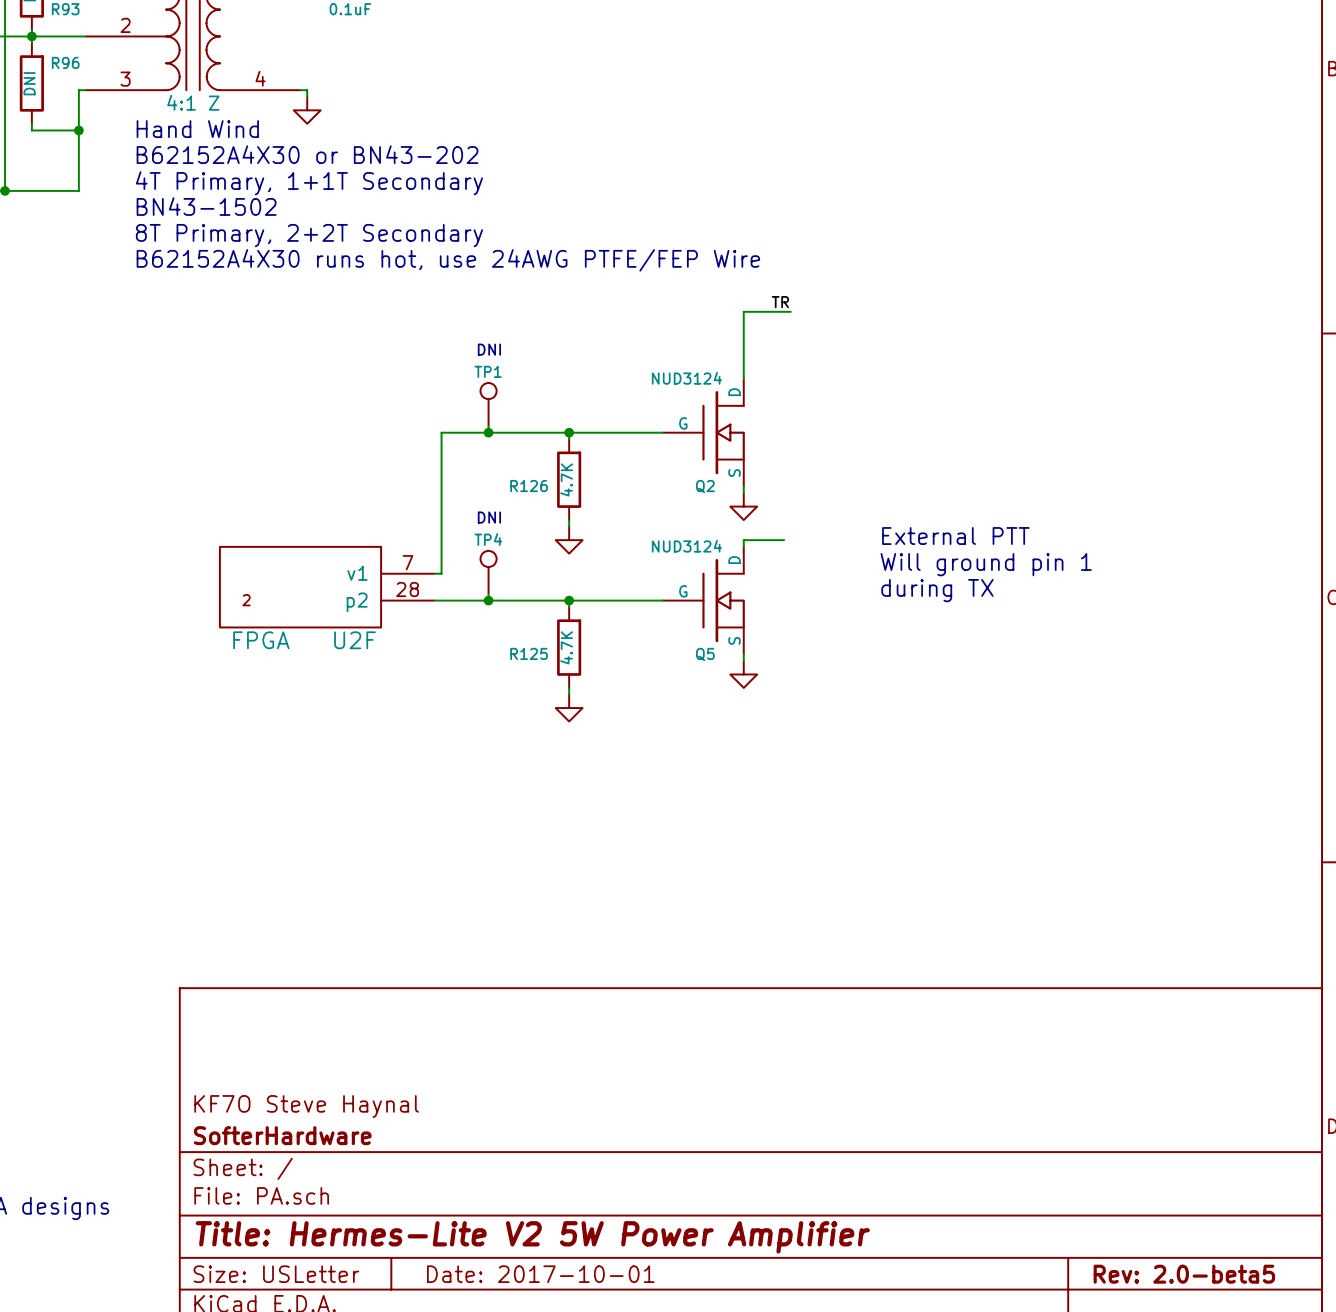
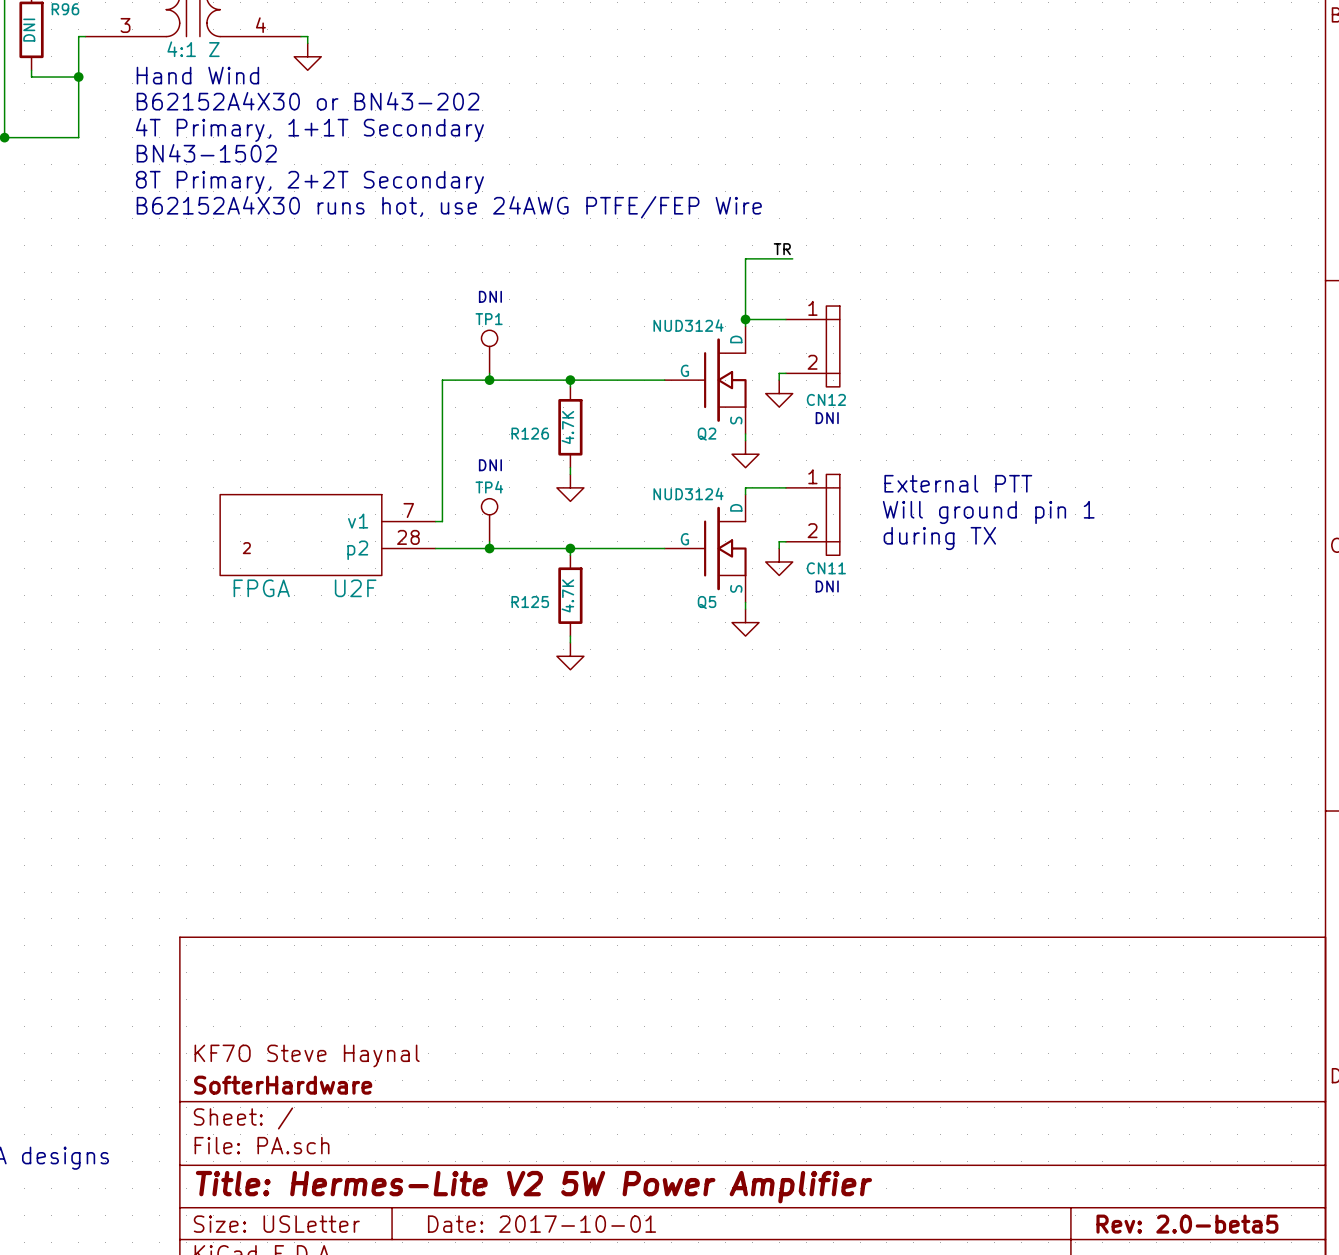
wire: none -> (745, 319) (785, 319)
junction: none -> (745, 319)
CN12: none -> (812, 346)
wire: none -> (785, 373) (779, 373) (779, 380)
power symbol: none -> (779, 393)
text: none -> DNI (827, 418)
CN11: none -> (812, 514)
wire: none -> (785, 541) (779, 541) (779, 548)
power symbol: none -> (779, 561)
text: none -> DNI (827, 586)

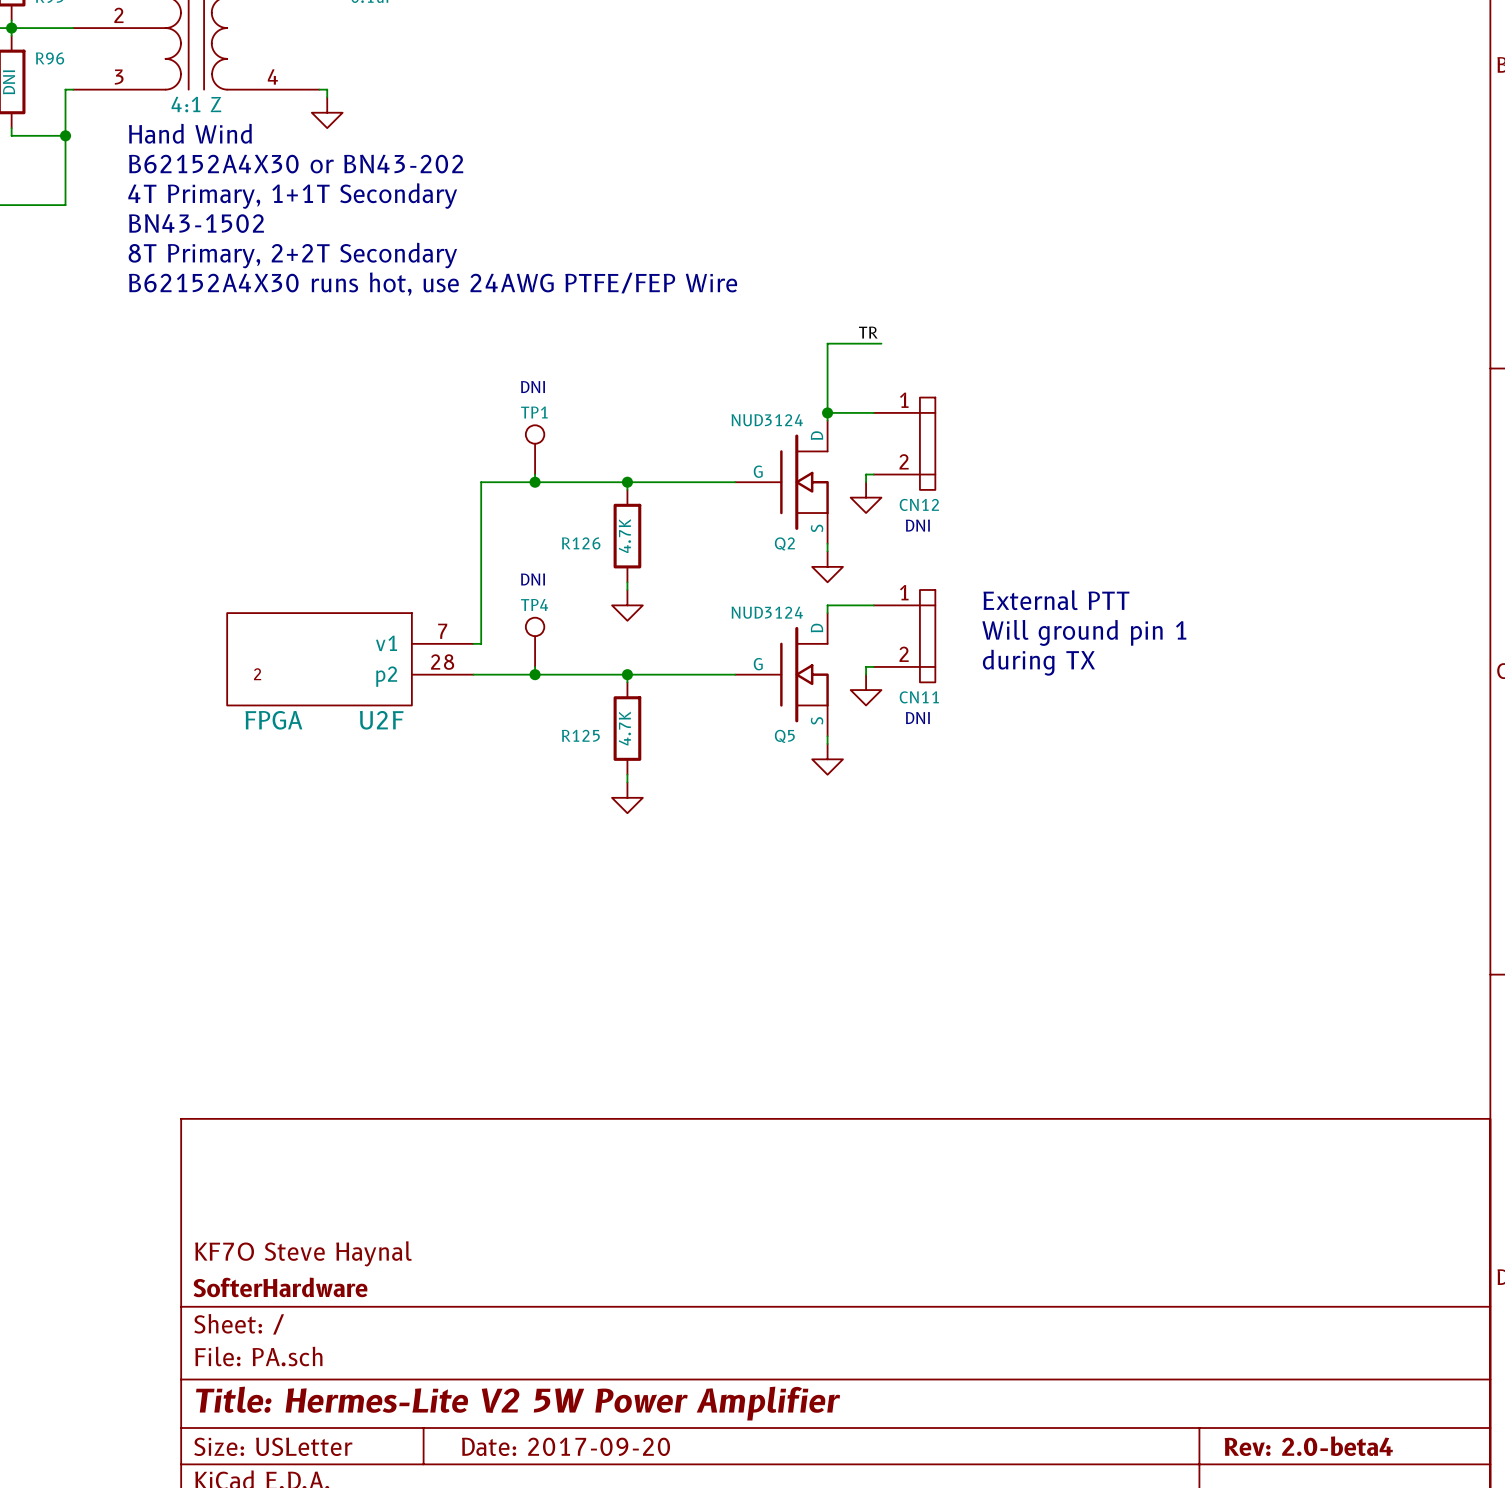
title block: Date: 2017-10-01 (541, 1224) -> Date: 2017-09-20 (566, 1446)
title block: Rev: 2.0-beta5 (1187, 1224) -> Rev: 2.0-beta4 (1308, 1446)

